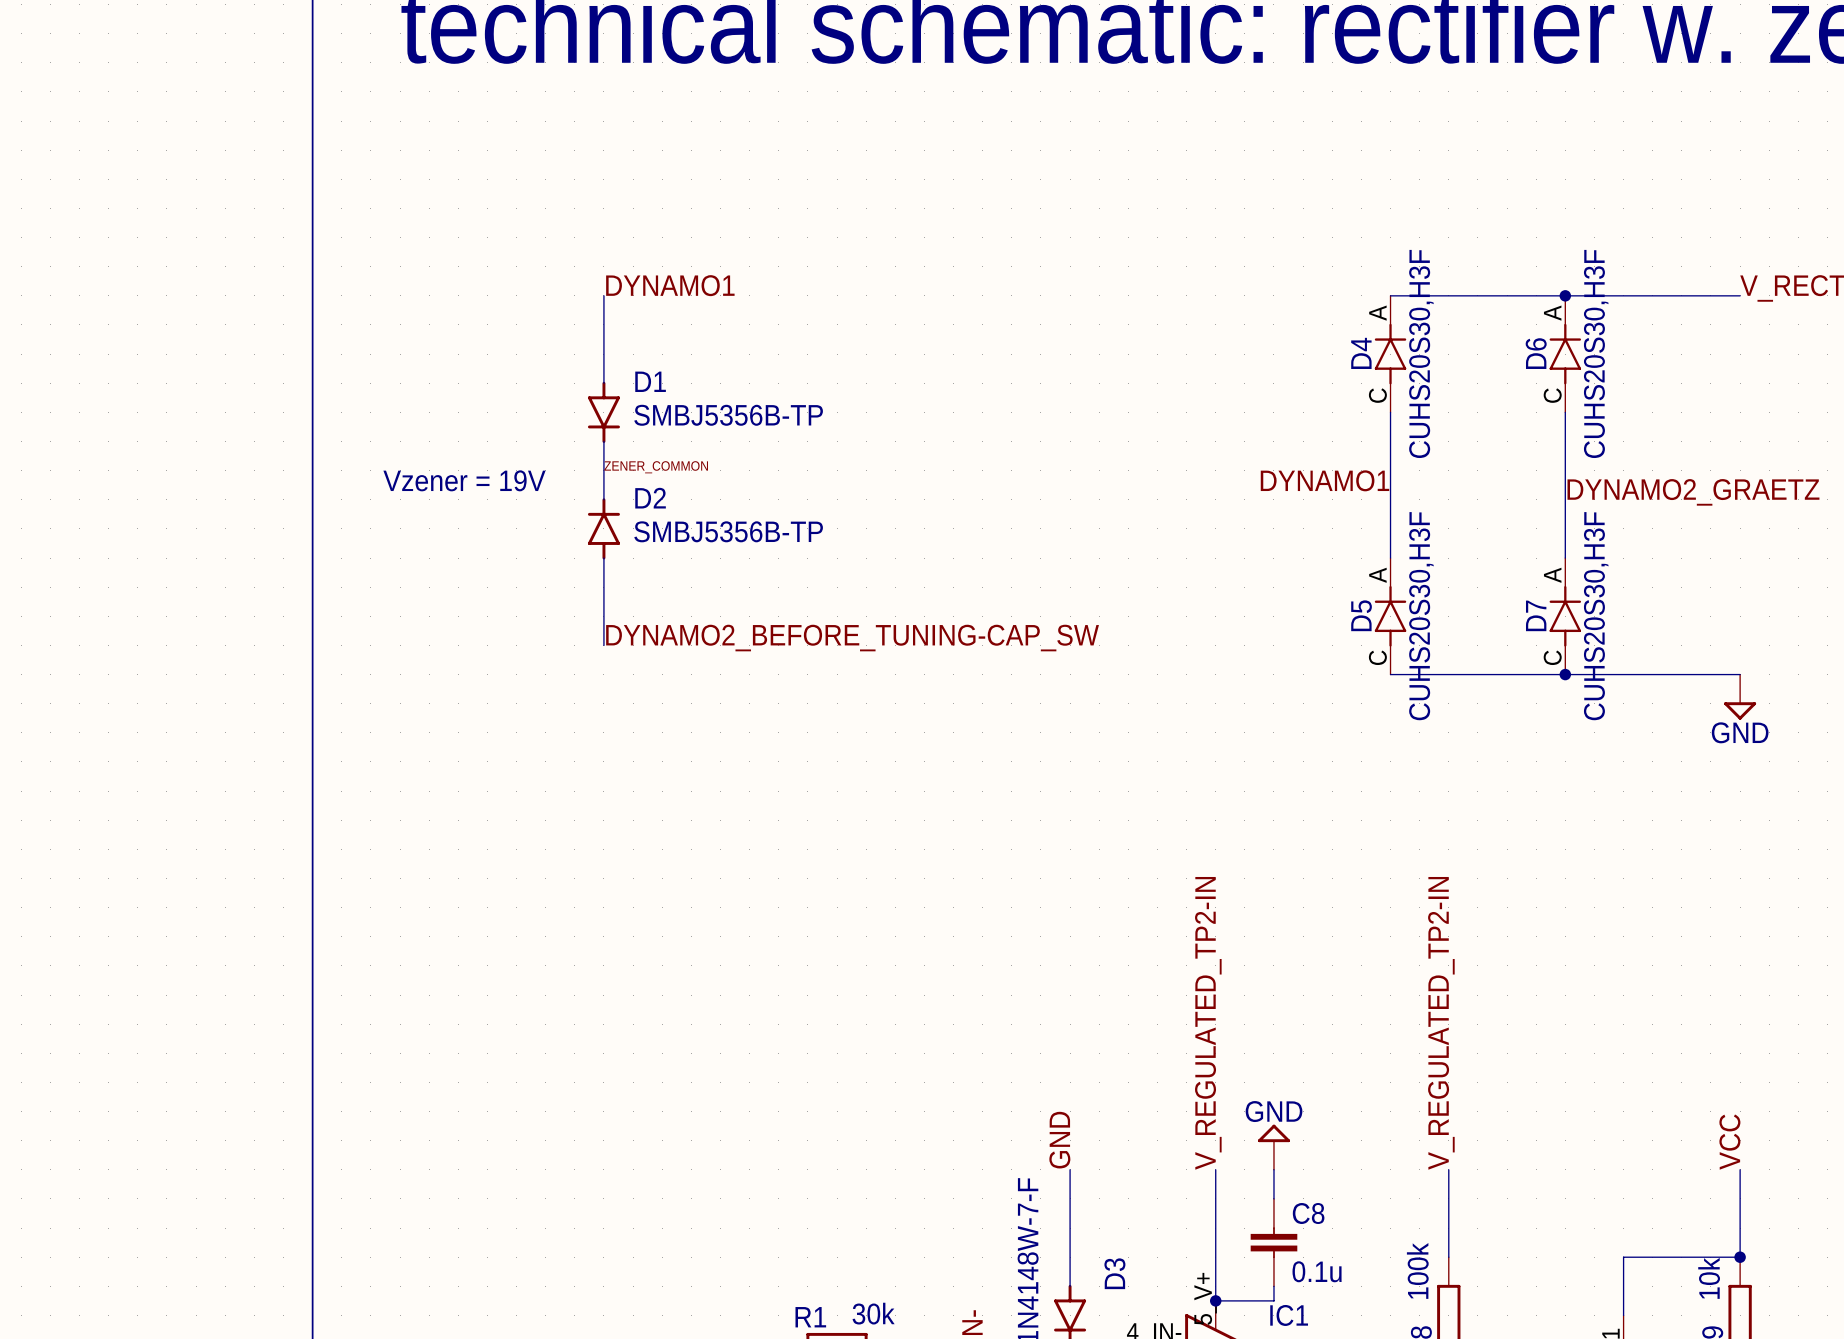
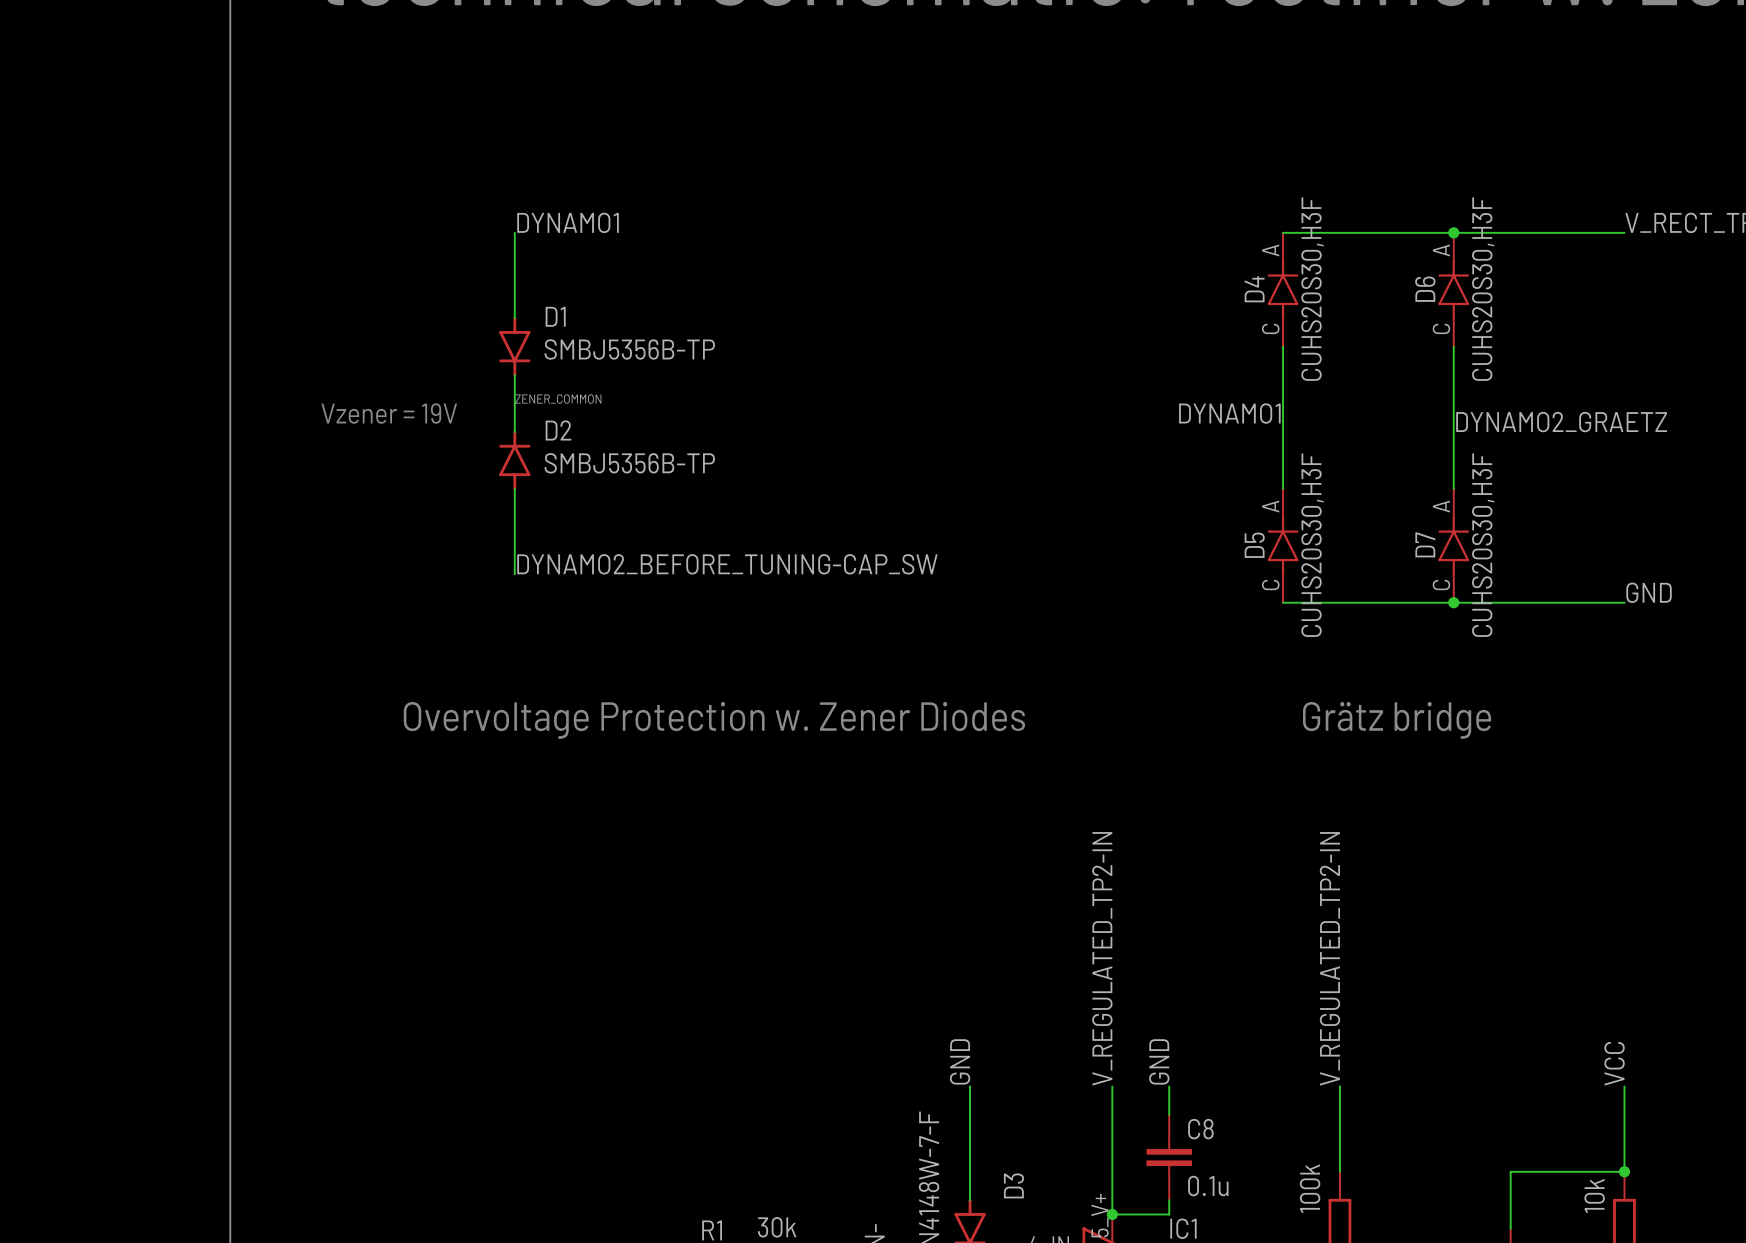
label: none -> GND (1649, 592)
power symbol: GND (1740, 697) -> none
text: none -> Overvoltage Protection w. Zener Diodes (714, 720)
text: none -> Grätz bridge (1397, 720)
label: none -> GND (1159, 1061)
power symbol: GND (1273, 1147) -> none

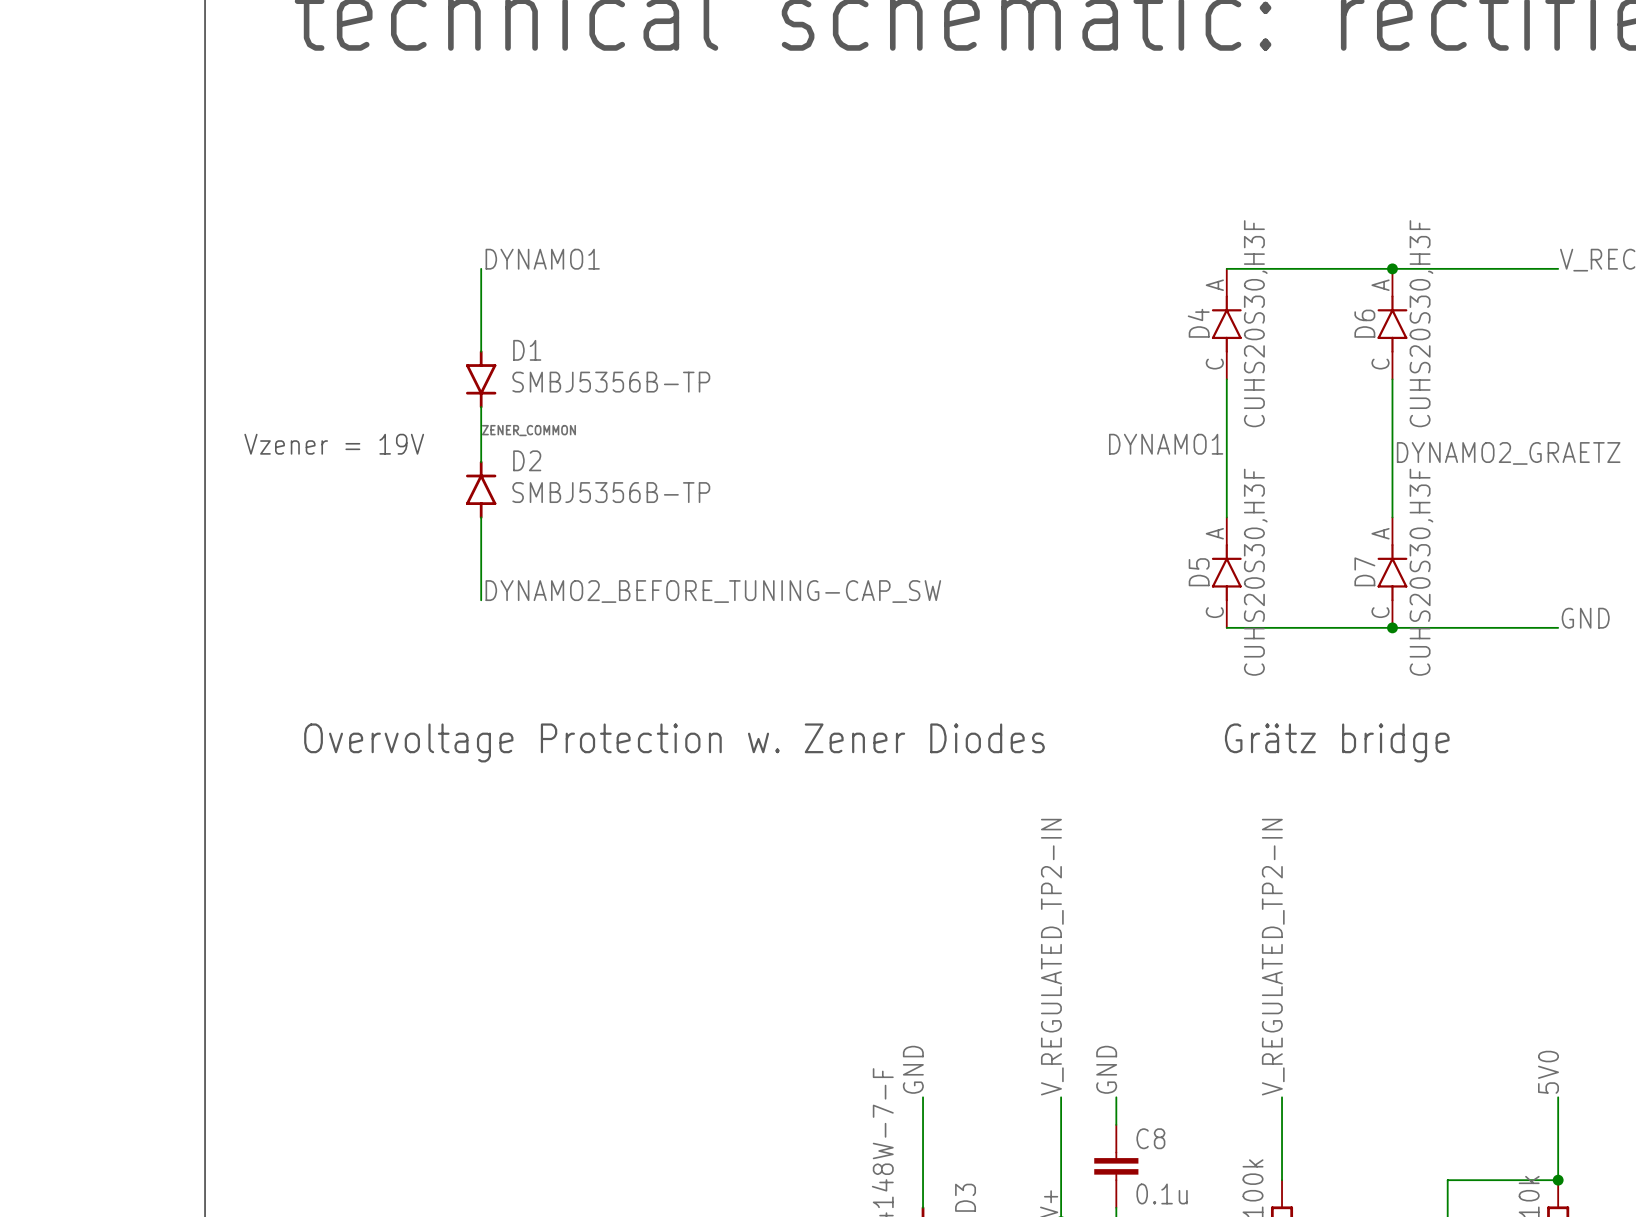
label: VCC (1614, 1063) -> 5V0 (1548, 1072)

